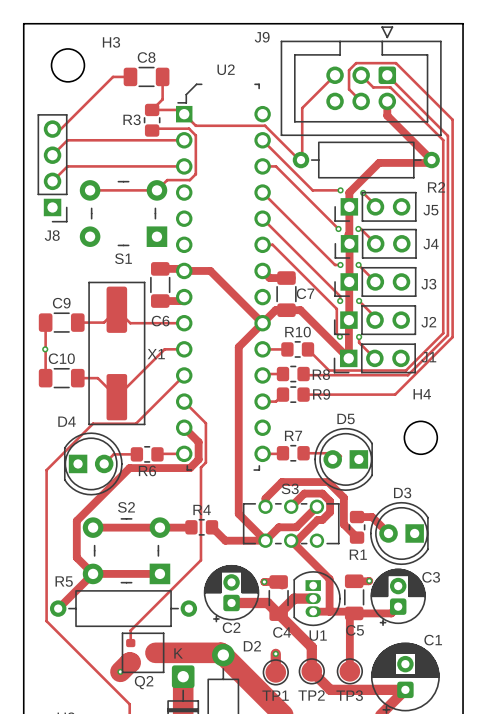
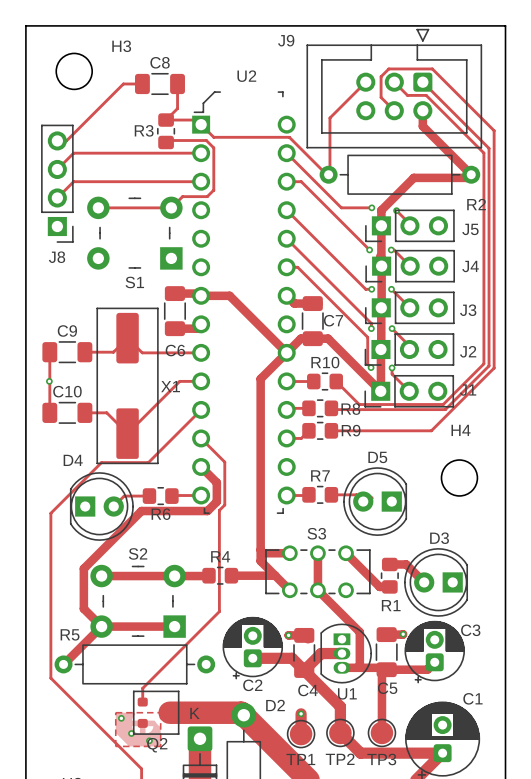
track: none -> (260, 549) (264, 553) (289, 553)
track: (265, 506) (265, 498) (281, 482) (328, 482) (343, 497) (343, 524) (357, 537) -> (346, 553) (379, 586) (389, 586)
track: (291, 506) (304, 493) (322, 493) (330, 501) (330, 512) (322, 519) (317, 519) (296, 540) (291, 540) -> (317, 553) (317, 590)
track: (316, 506) (296, 527) (278, 527) (265, 540) (225, 540) (212, 527) -> (275, 575) (231, 575)
zone outline: none -> (115, 712) (160, 712) (160, 746) (115, 746) (115, 712)
via: none -> (121, 718)
track: (130, 662) (120, 671) -> none
via: none -> (149, 740)

